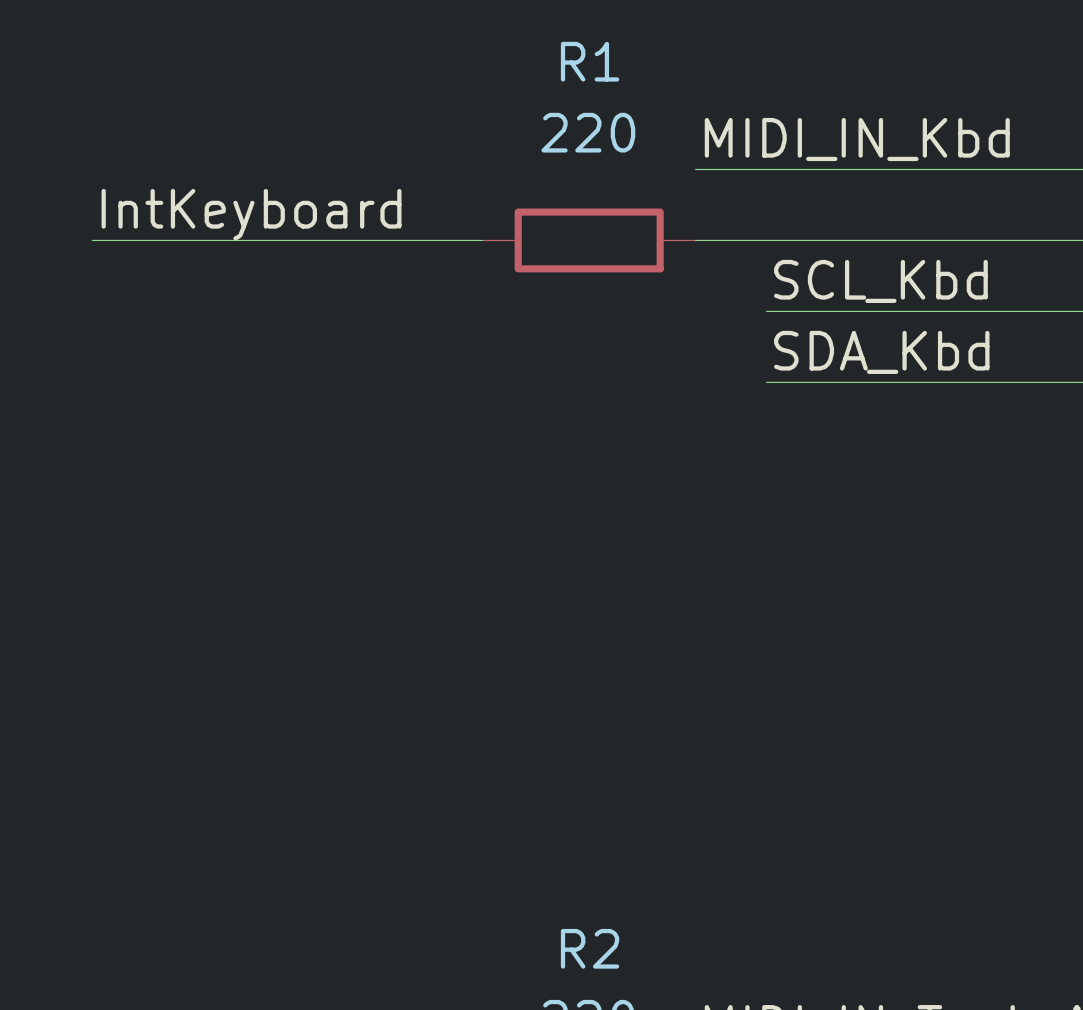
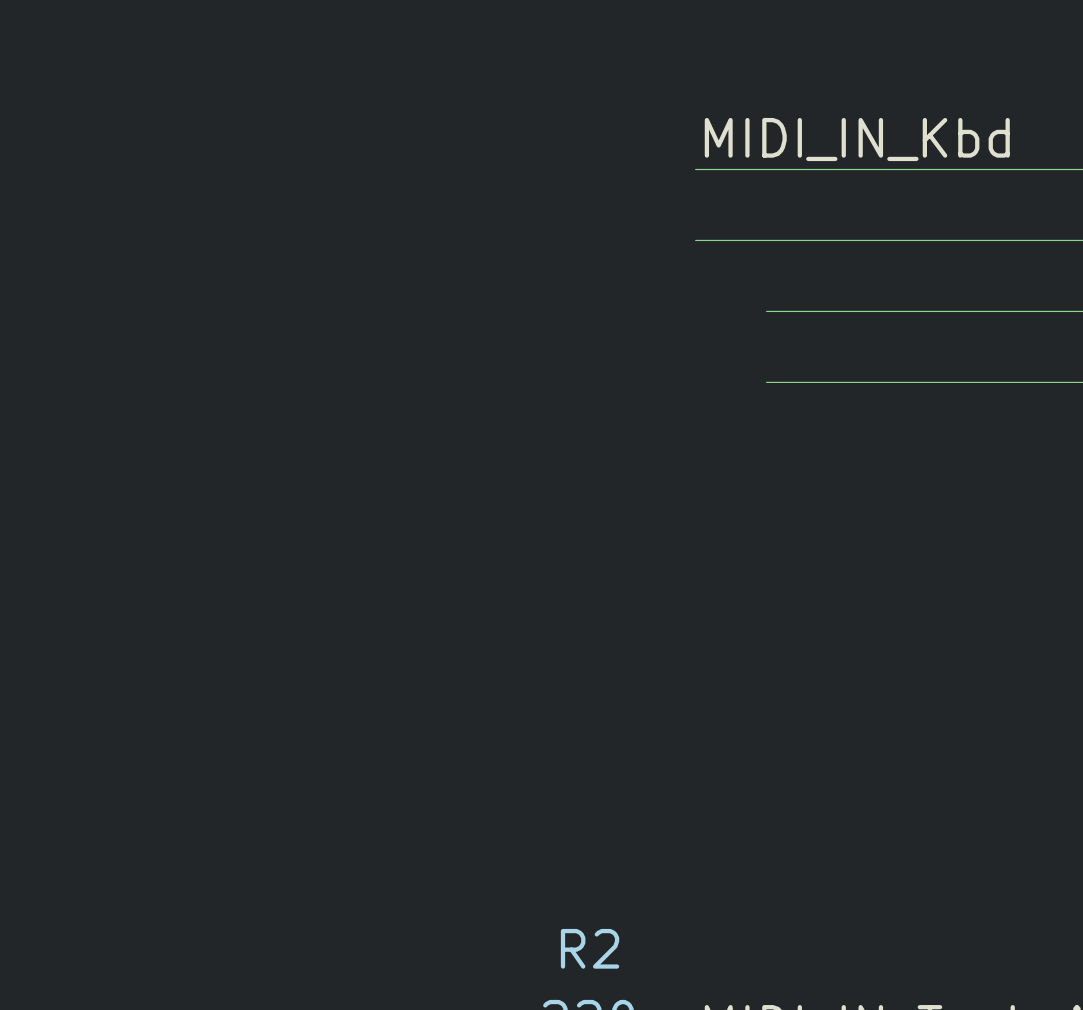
label: IntKeyboard (251, 214) -> none
wire: (92, 240) (482, 240) -> none
R1: 220 (589, 240) -> none
label: SCL_Kbd (880, 281) -> none
label: SDA_Kbd (881, 352) -> none

